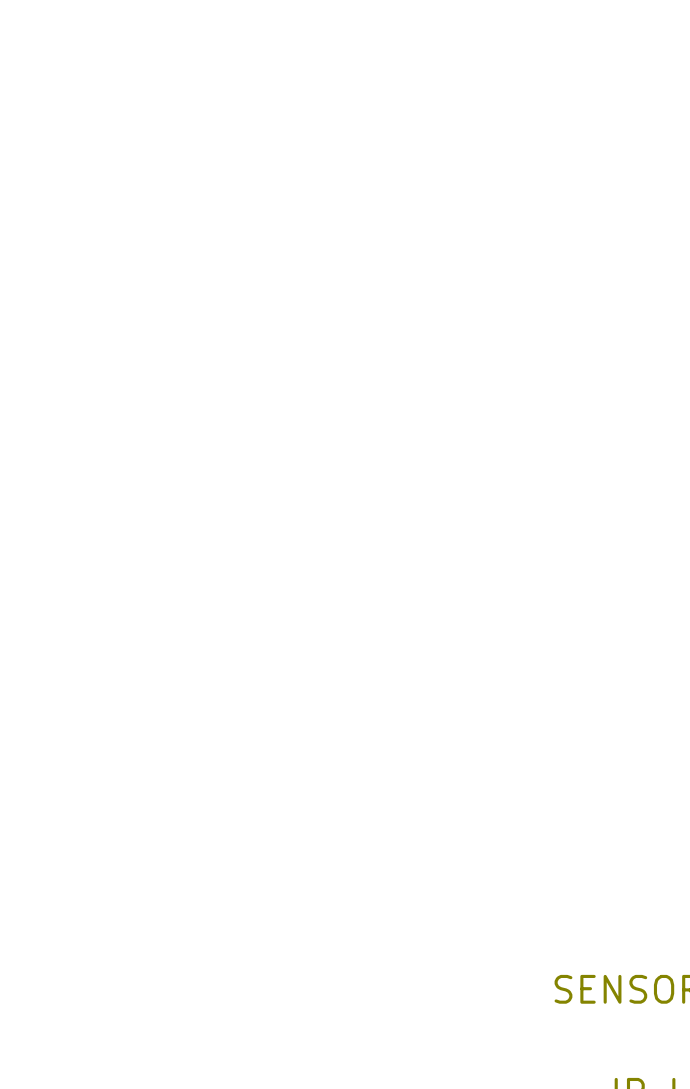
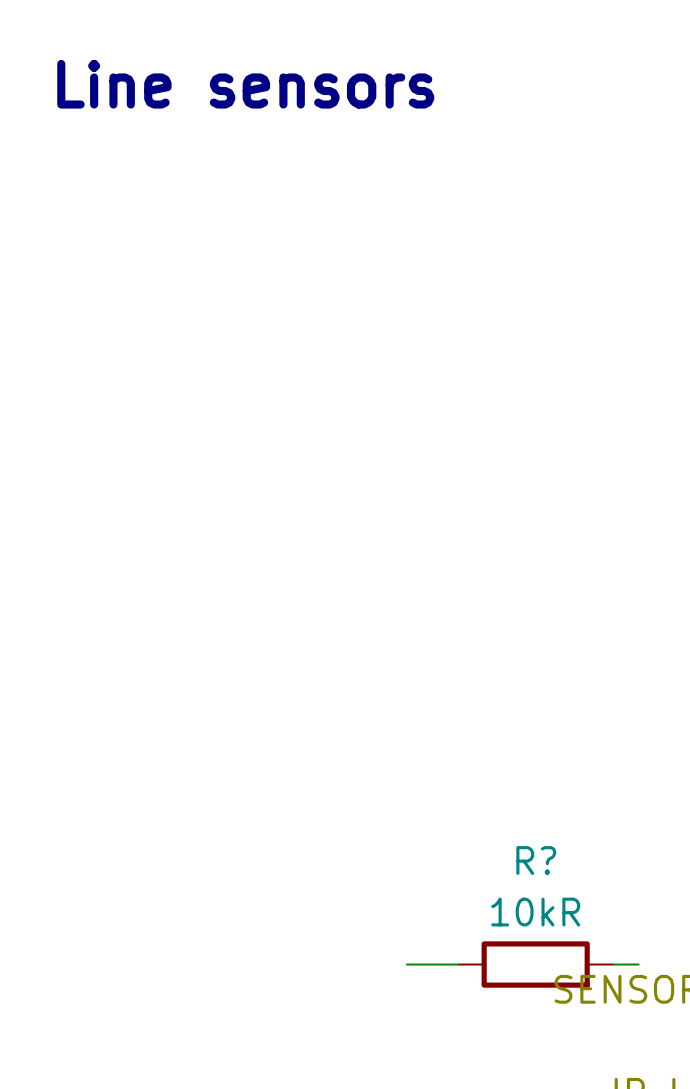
text: none -> Line sensors (245, 84)
wire: none -> (406, 964) (458, 964)
R?: none -> 10kR (535, 964)
wire: none -> (612, 964) (638, 964)

